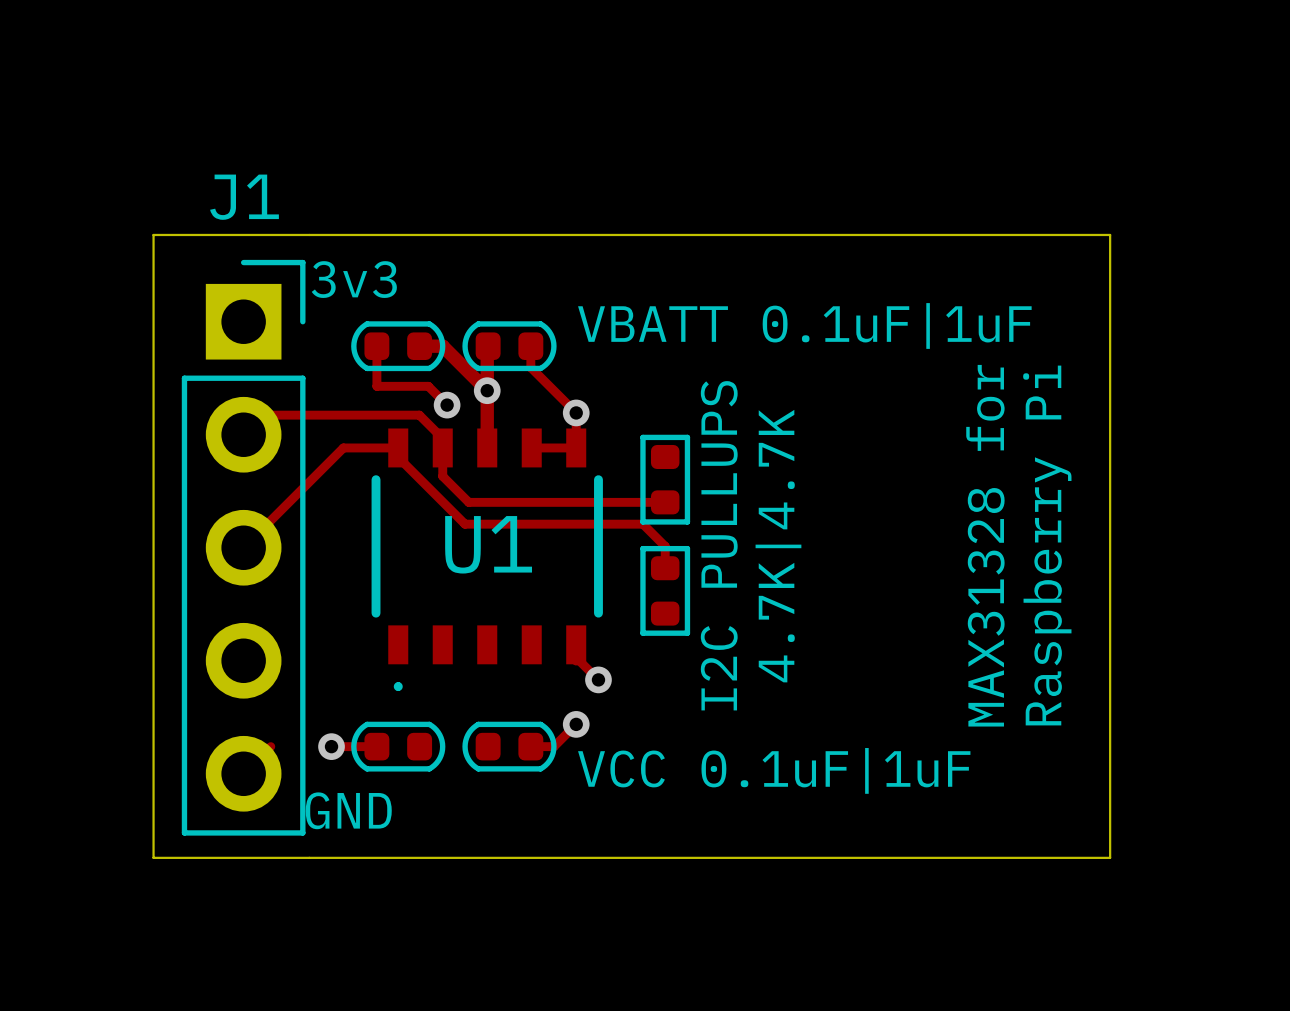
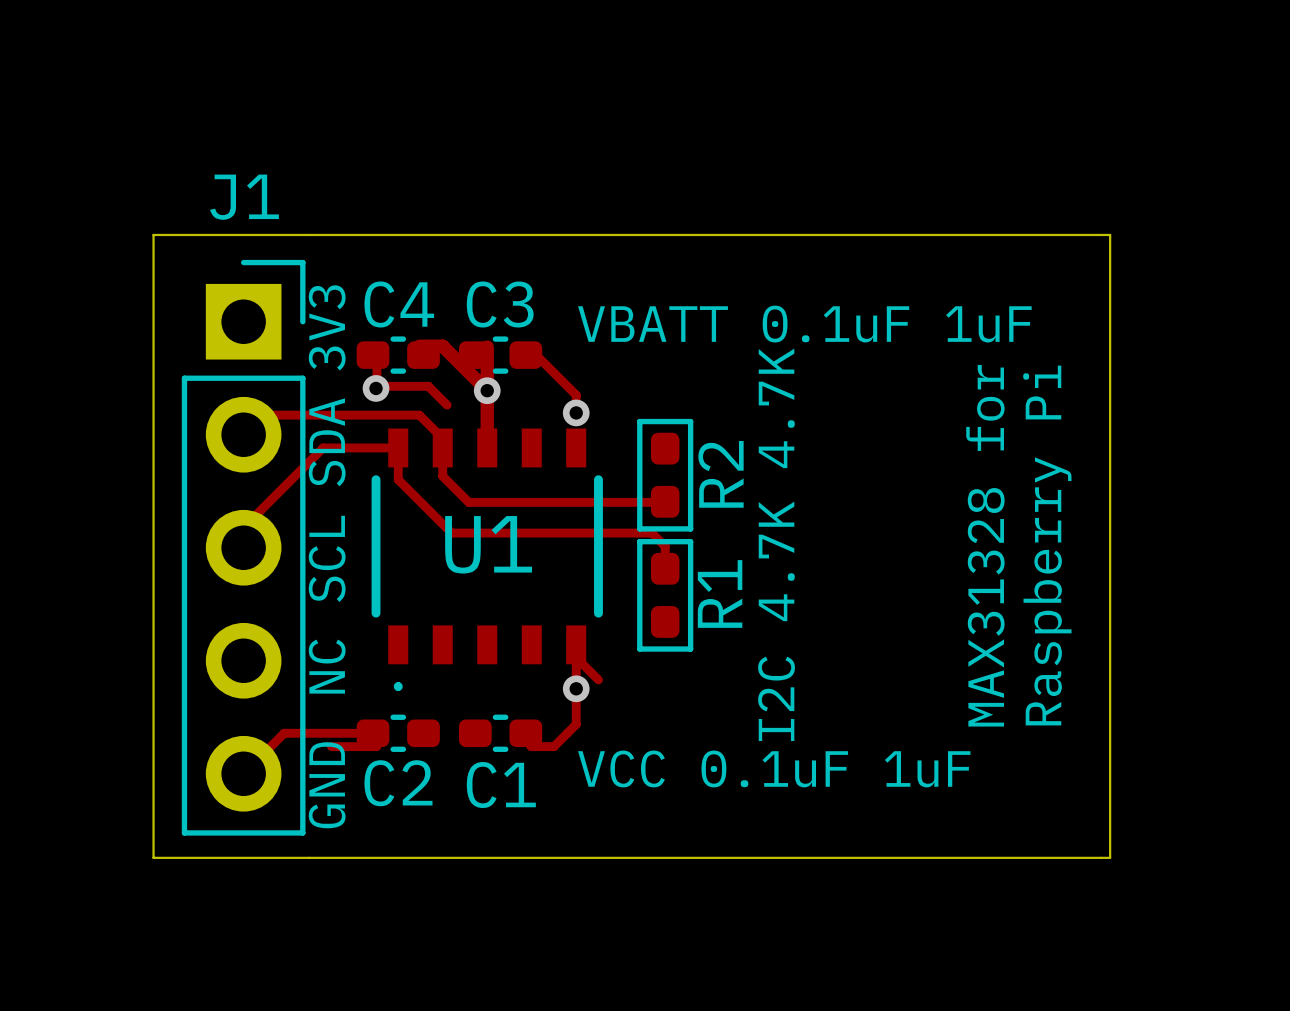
text: 3v3 (354, 279) -> 3V3 (327, 327)
text: VBATT 0.1uF|1uF (804, 325) -> VBATT 0.1uF 1uF (804, 324)
part: (398, 346) -> none
part: (509, 346) -> none
track: (530, 346) (530, 367) (576, 412) (576, 435) -> none
C4: none -> (398, 355)
C3: none -> (500, 355)
track: none -> (517, 355) (536, 355) (576, 395) (576, 404)
via position: (447, 405) -> (376, 388)
text: none -> SDA (327, 442)
track: (343, 447) (243, 547) -> (343, 447) (323, 447) (243, 527)
track: (531, 447) (576, 447) -> none
track: (398, 457) (465, 524) (642, 524) (651, 533) -> (398, 457) (398, 479) (451, 533) (651, 533)
R2: none -> (665, 475)
part: (665, 479) -> none
text: I2C PULLUPS (719, 545) -> none
text: 4.7K|4.7K (778, 546) -> I2C 4.7K 4.7K (776, 544)
text: none -> SCL (327, 558)
part: (665, 590) -> none
R1: none -> (665, 595)
track: none -> (576, 661) (576, 724)
text: none -> NC (327, 666)
via position: (598, 679) -> (576, 688)
via: (576, 724) -> none
track: none -> (376, 733) (284, 733) (270, 746)
C2: none -> (398, 733)
C1: none -> (500, 733)
via: (331, 746) -> none
part: (398, 746) -> none
part: (509, 746) -> none
text: VCC 0.1uF|1uF (774, 770) -> VCC 0.1uF 1uF (774, 768)
text rotation: 0° (348, 810) -> 90° counterclockwise (327, 785)

